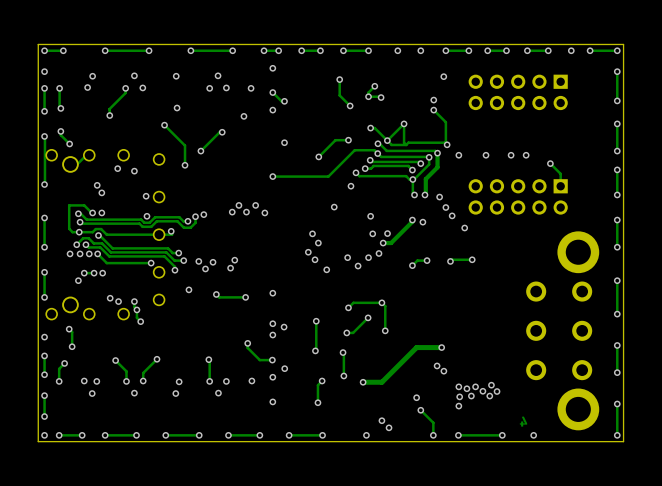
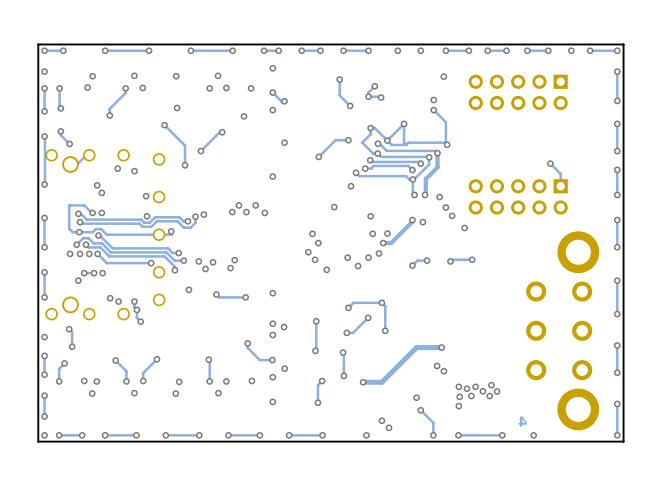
track: (377, 153) (374, 150) (354, 150) (328, 176) (272, 176) -> (377, 153) (373, 153) (362, 142) (370, 134) (370, 128)
via: (458, 155) -> none
via: (486, 155) -> none
via: (511, 155) -> none
via: (526, 155) -> none

